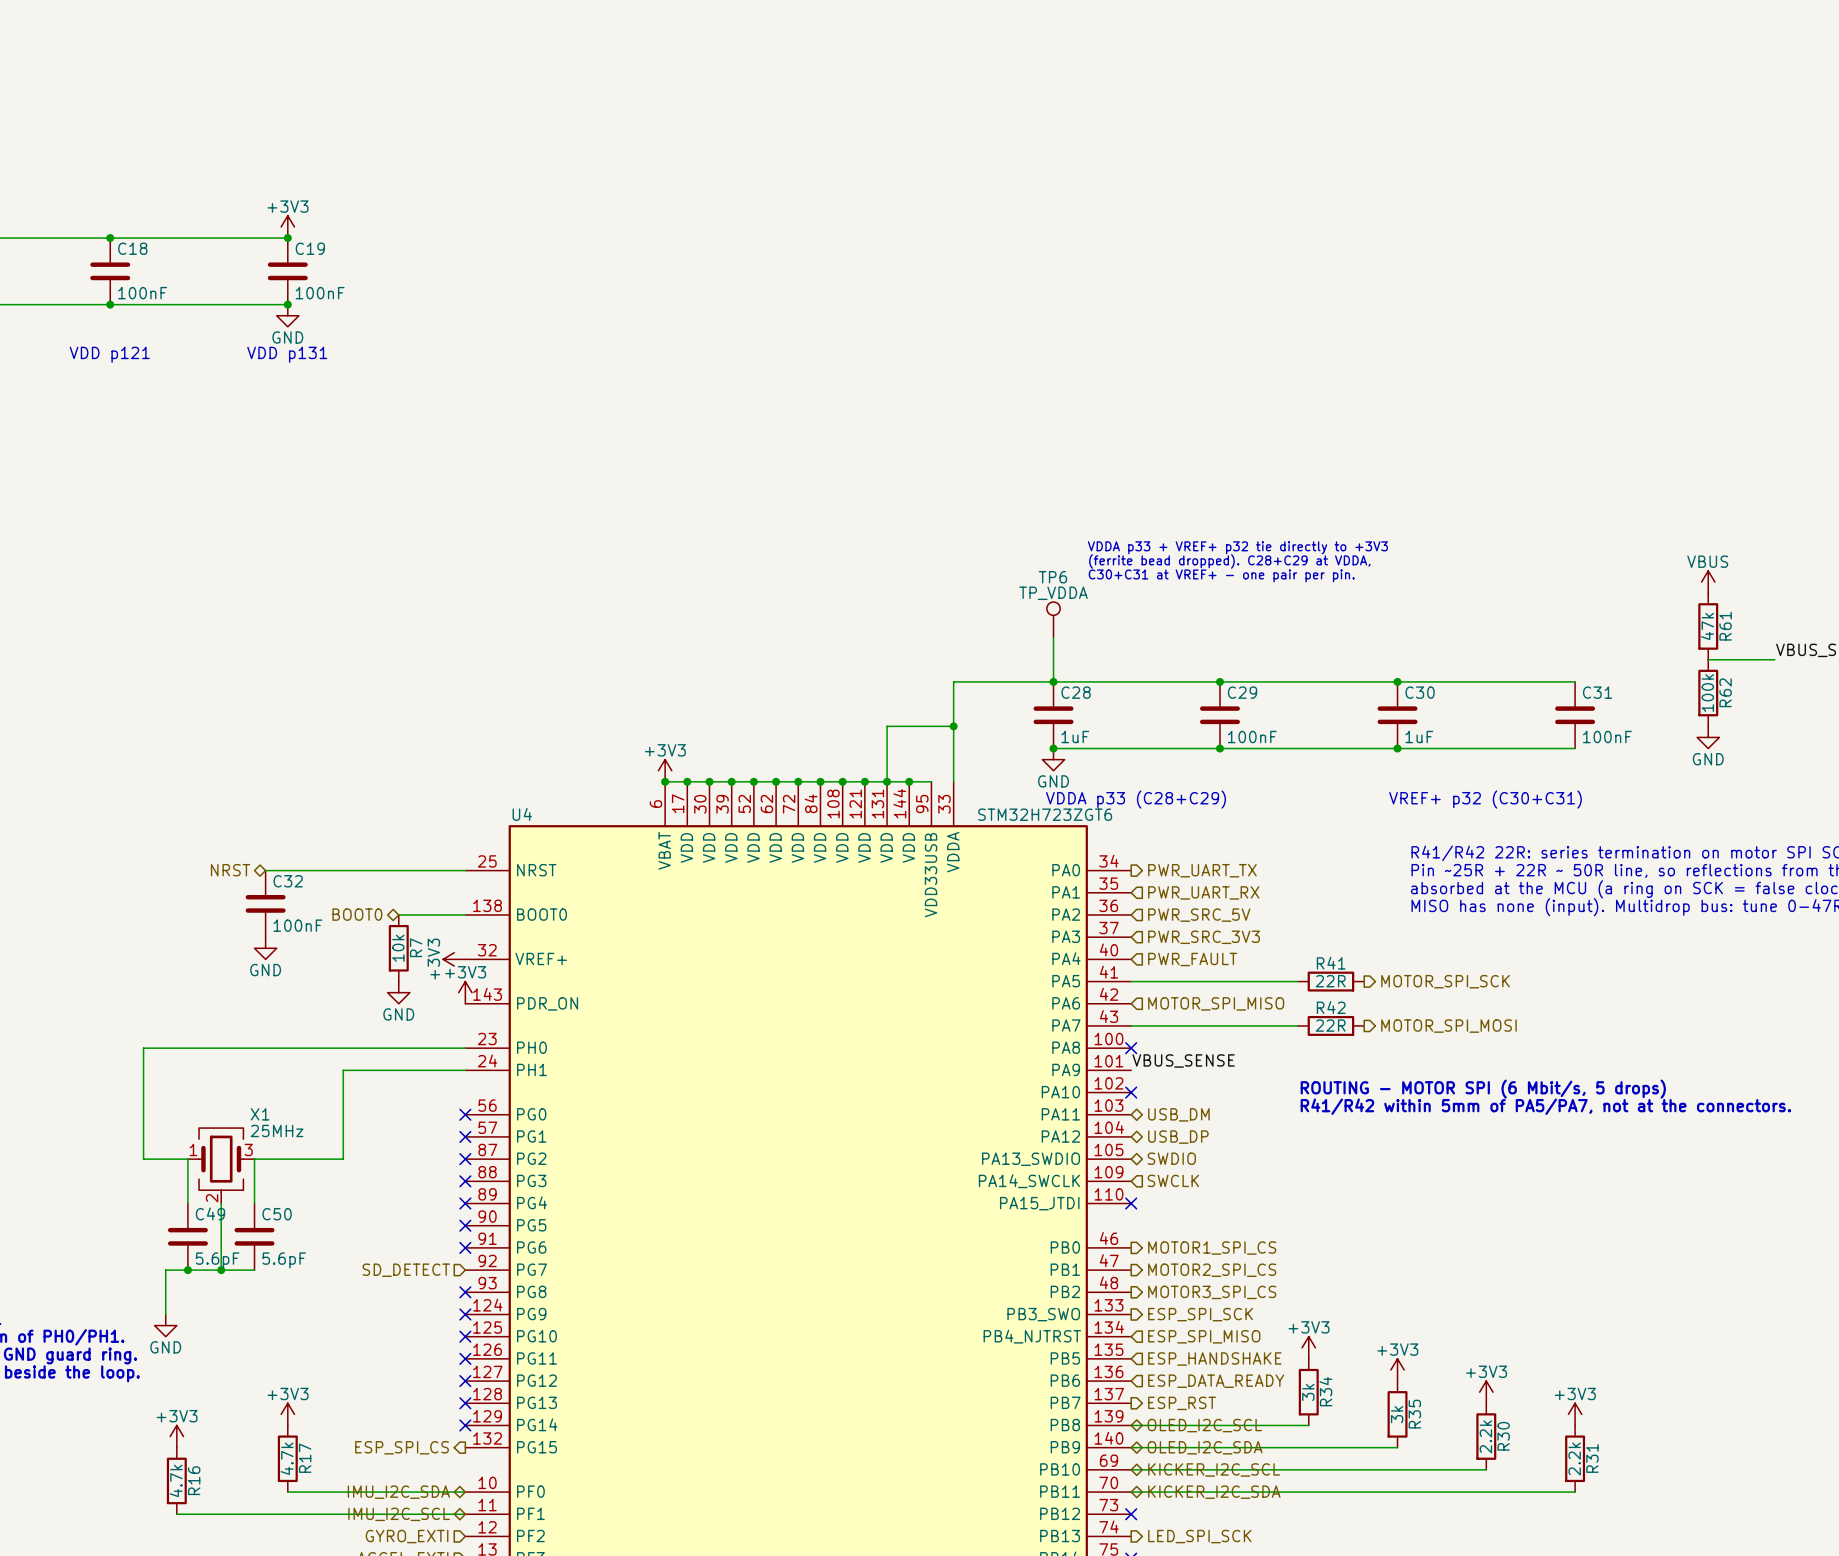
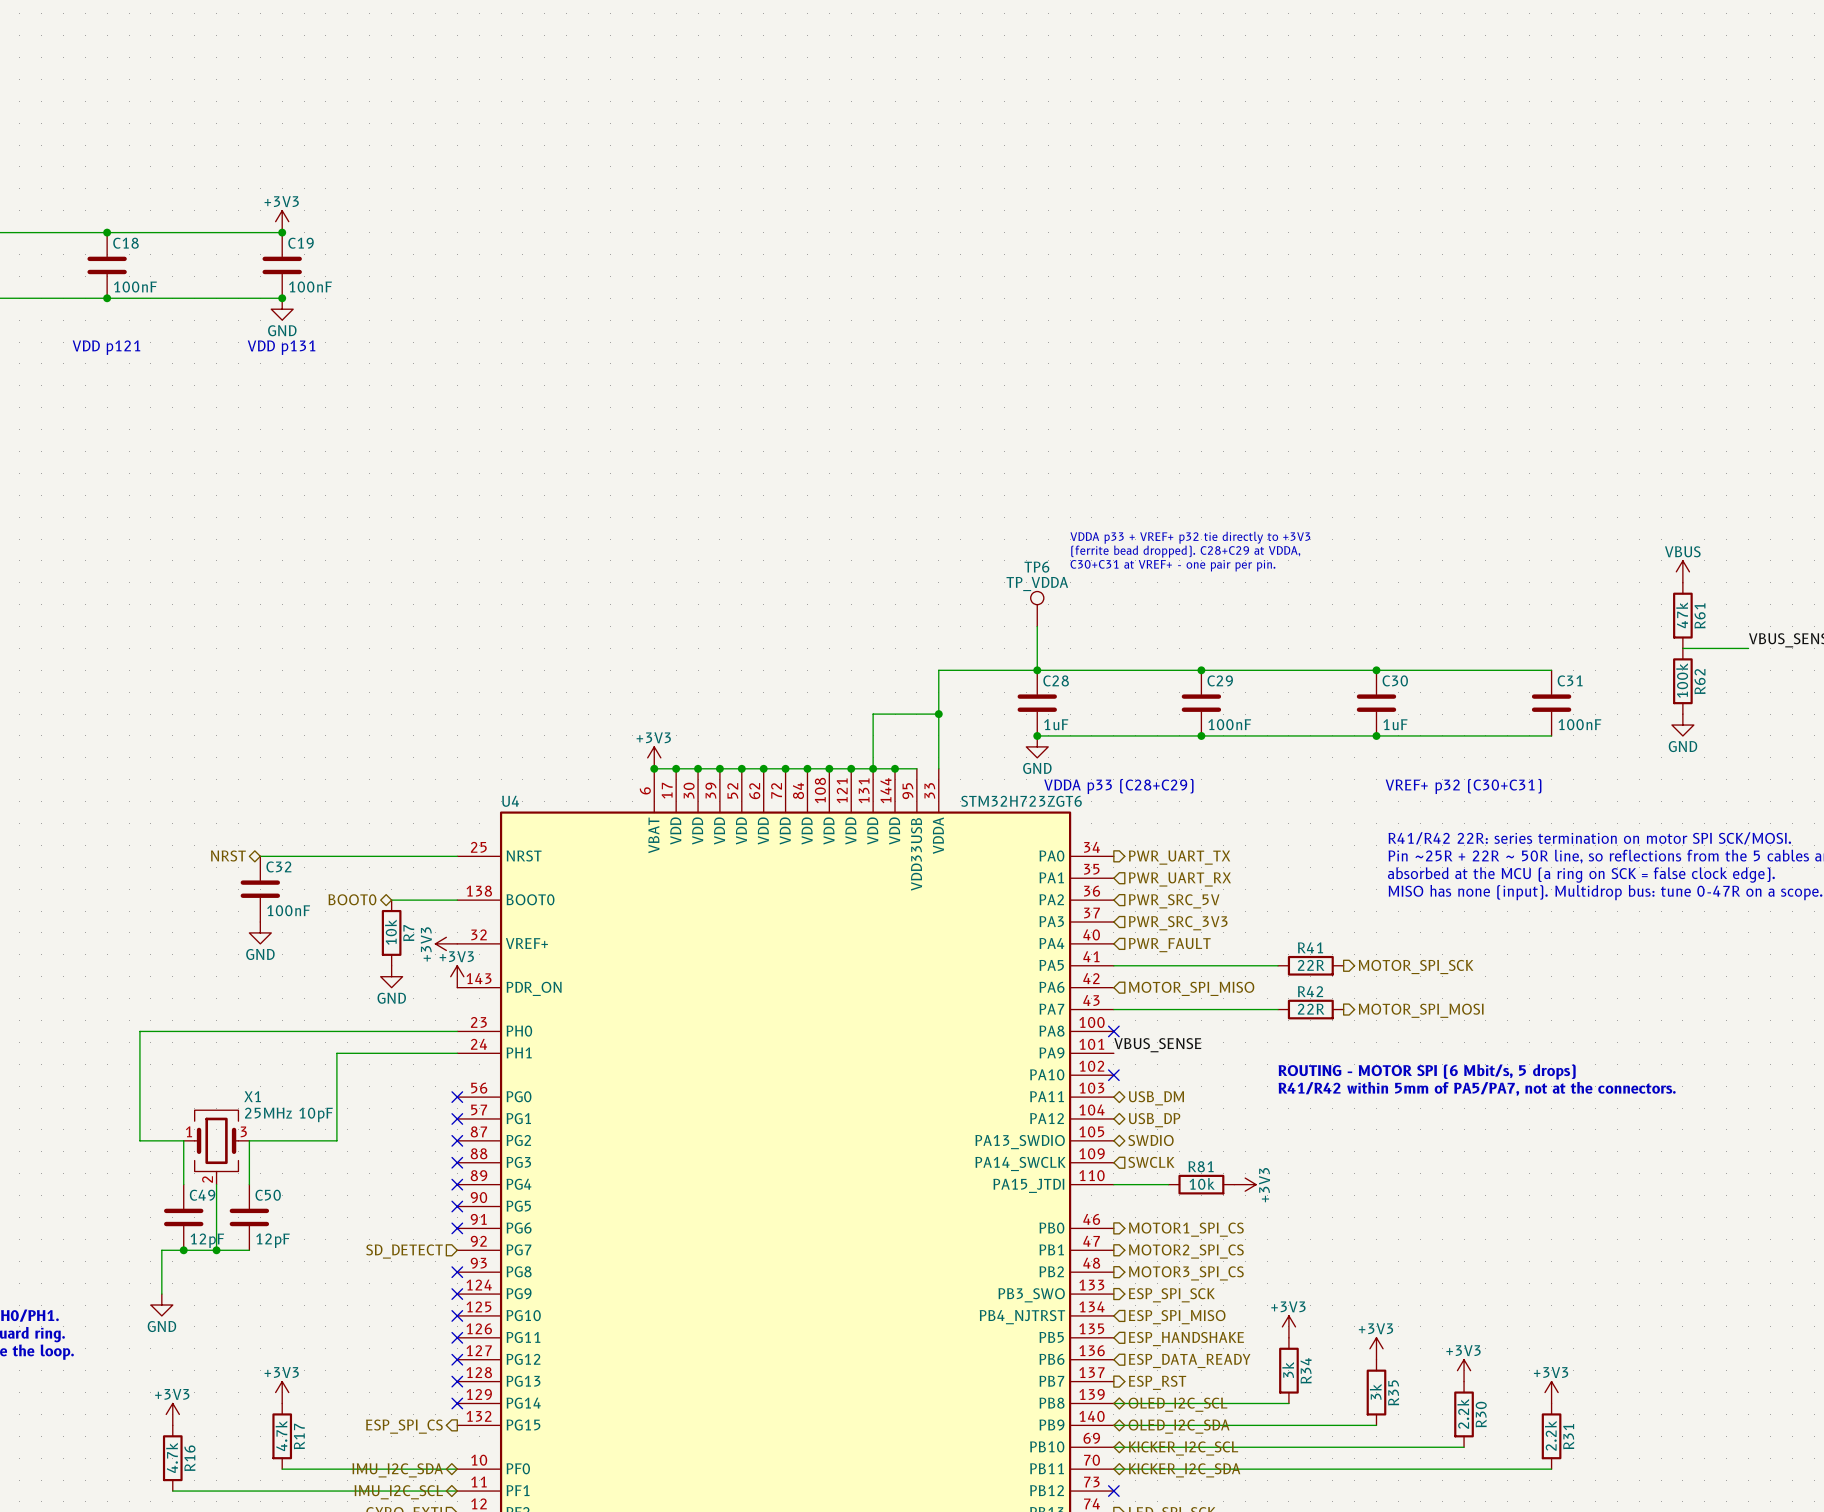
X1 value: 25MHz (277, 1130) -> 25MHz 10pF (288, 1114)
wire: none -> (1113, 1184) (1168, 1184)
no-connect mark: (1131, 1203) -> none
R81: none -> 10k (1201, 1184)
power symbol: none -> +3V3 (1245, 1184)
C49 value: 5.6pF (217, 1260) -> 12pF (207, 1240)
C50 value: 5.6pF (284, 1260) -> 12pF (273, 1240)

